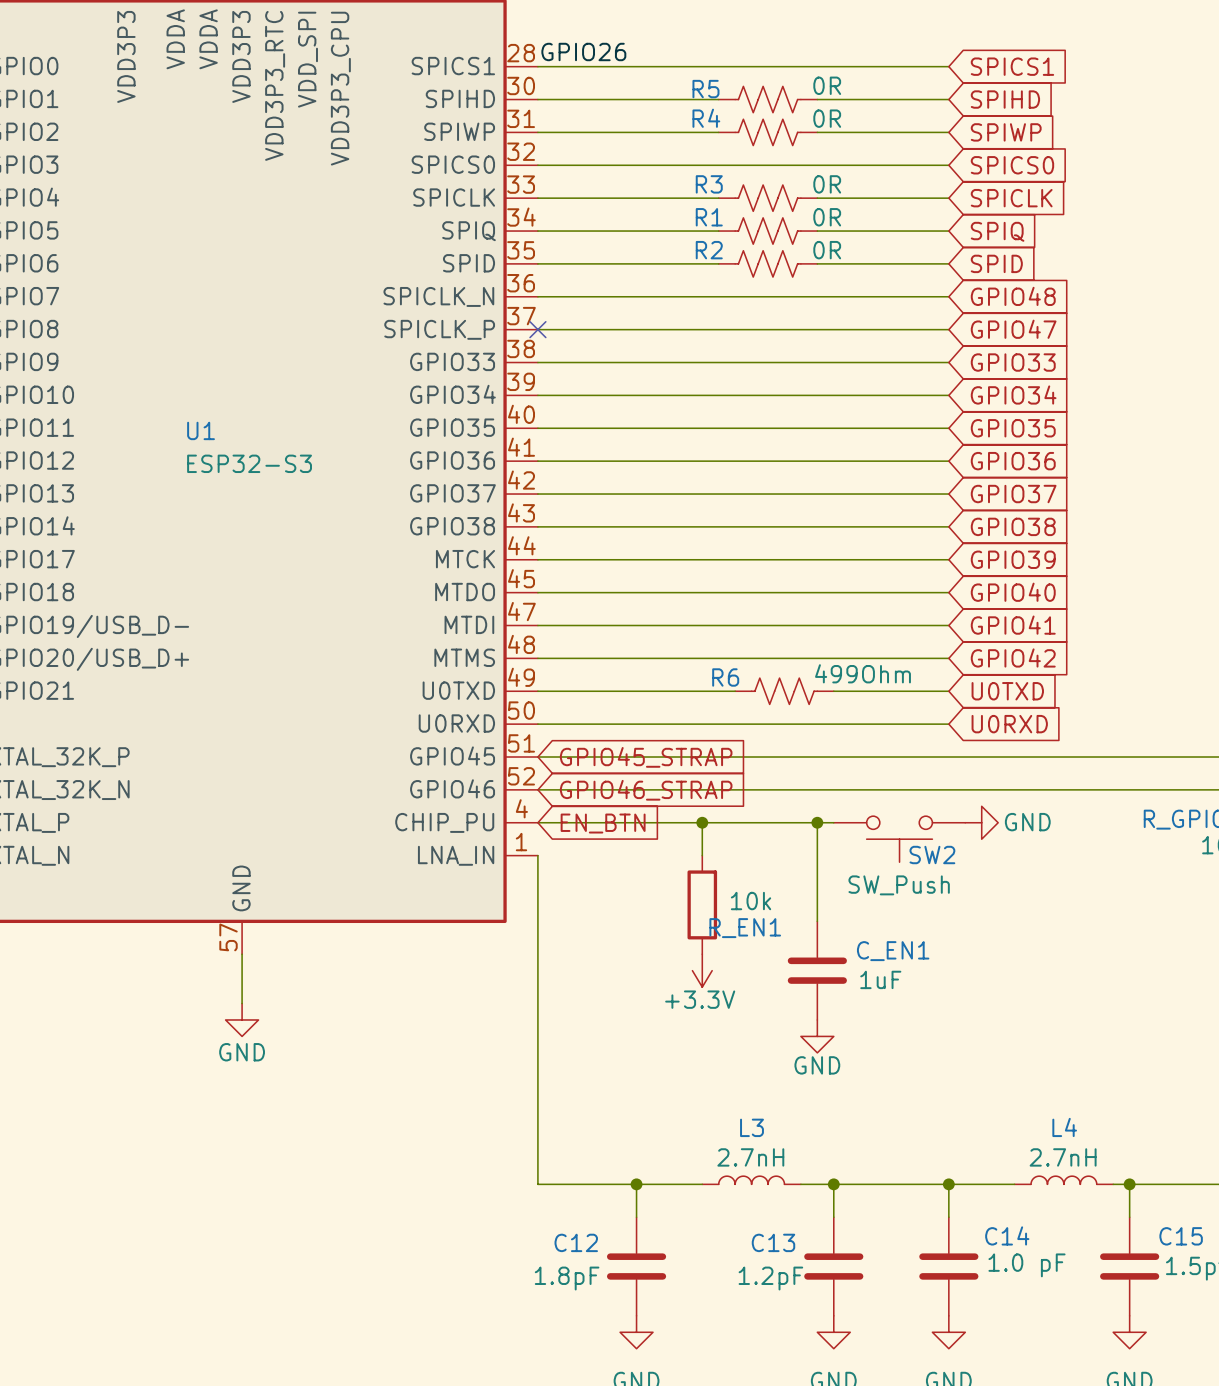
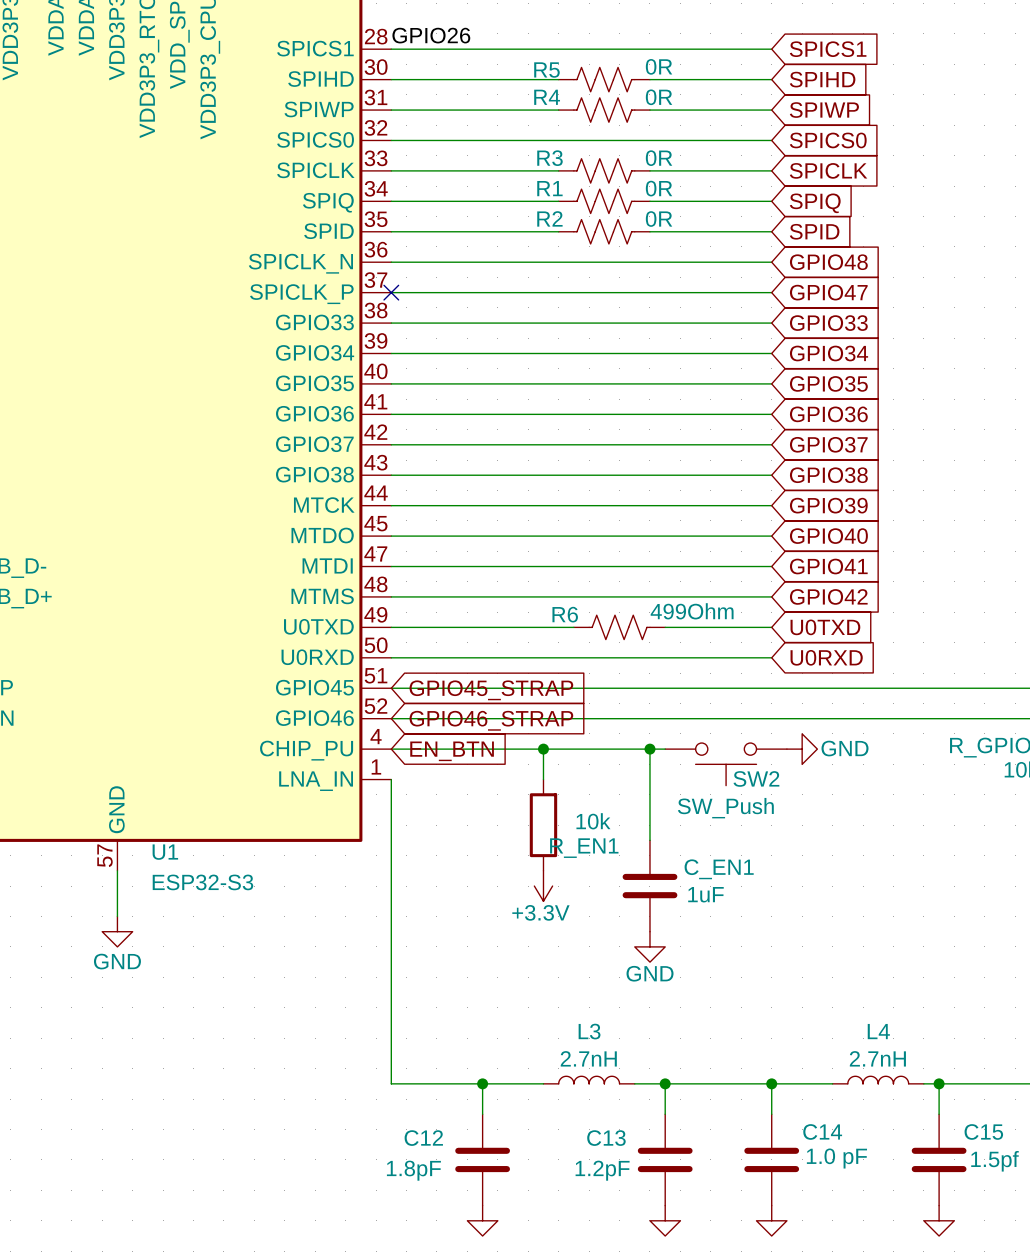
U1 name position: U1 (201, 430) -> U1 (165, 852)
U1 value position: ESP32-S3 (249, 463) -> ESP32-S3 (202, 882)

